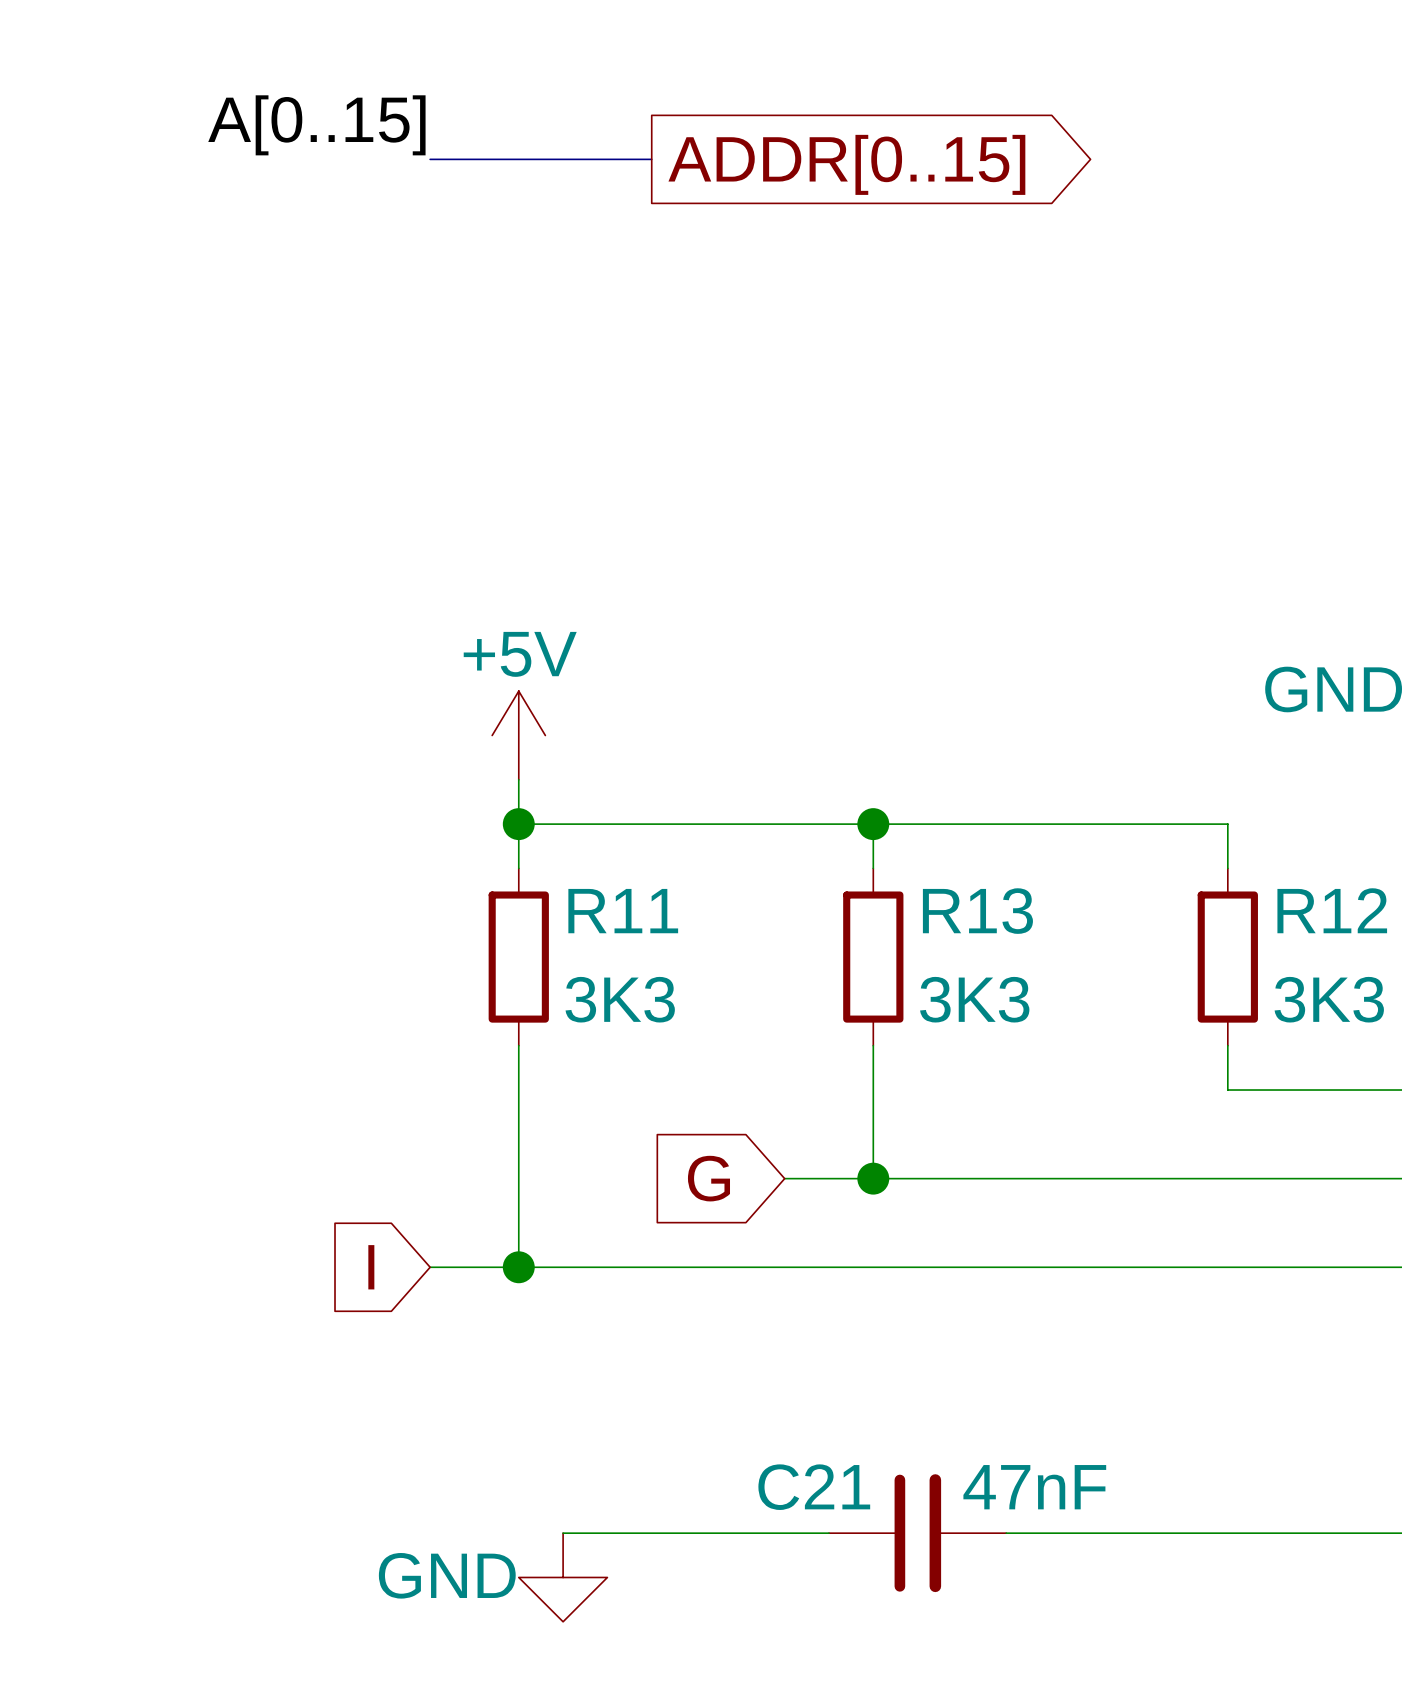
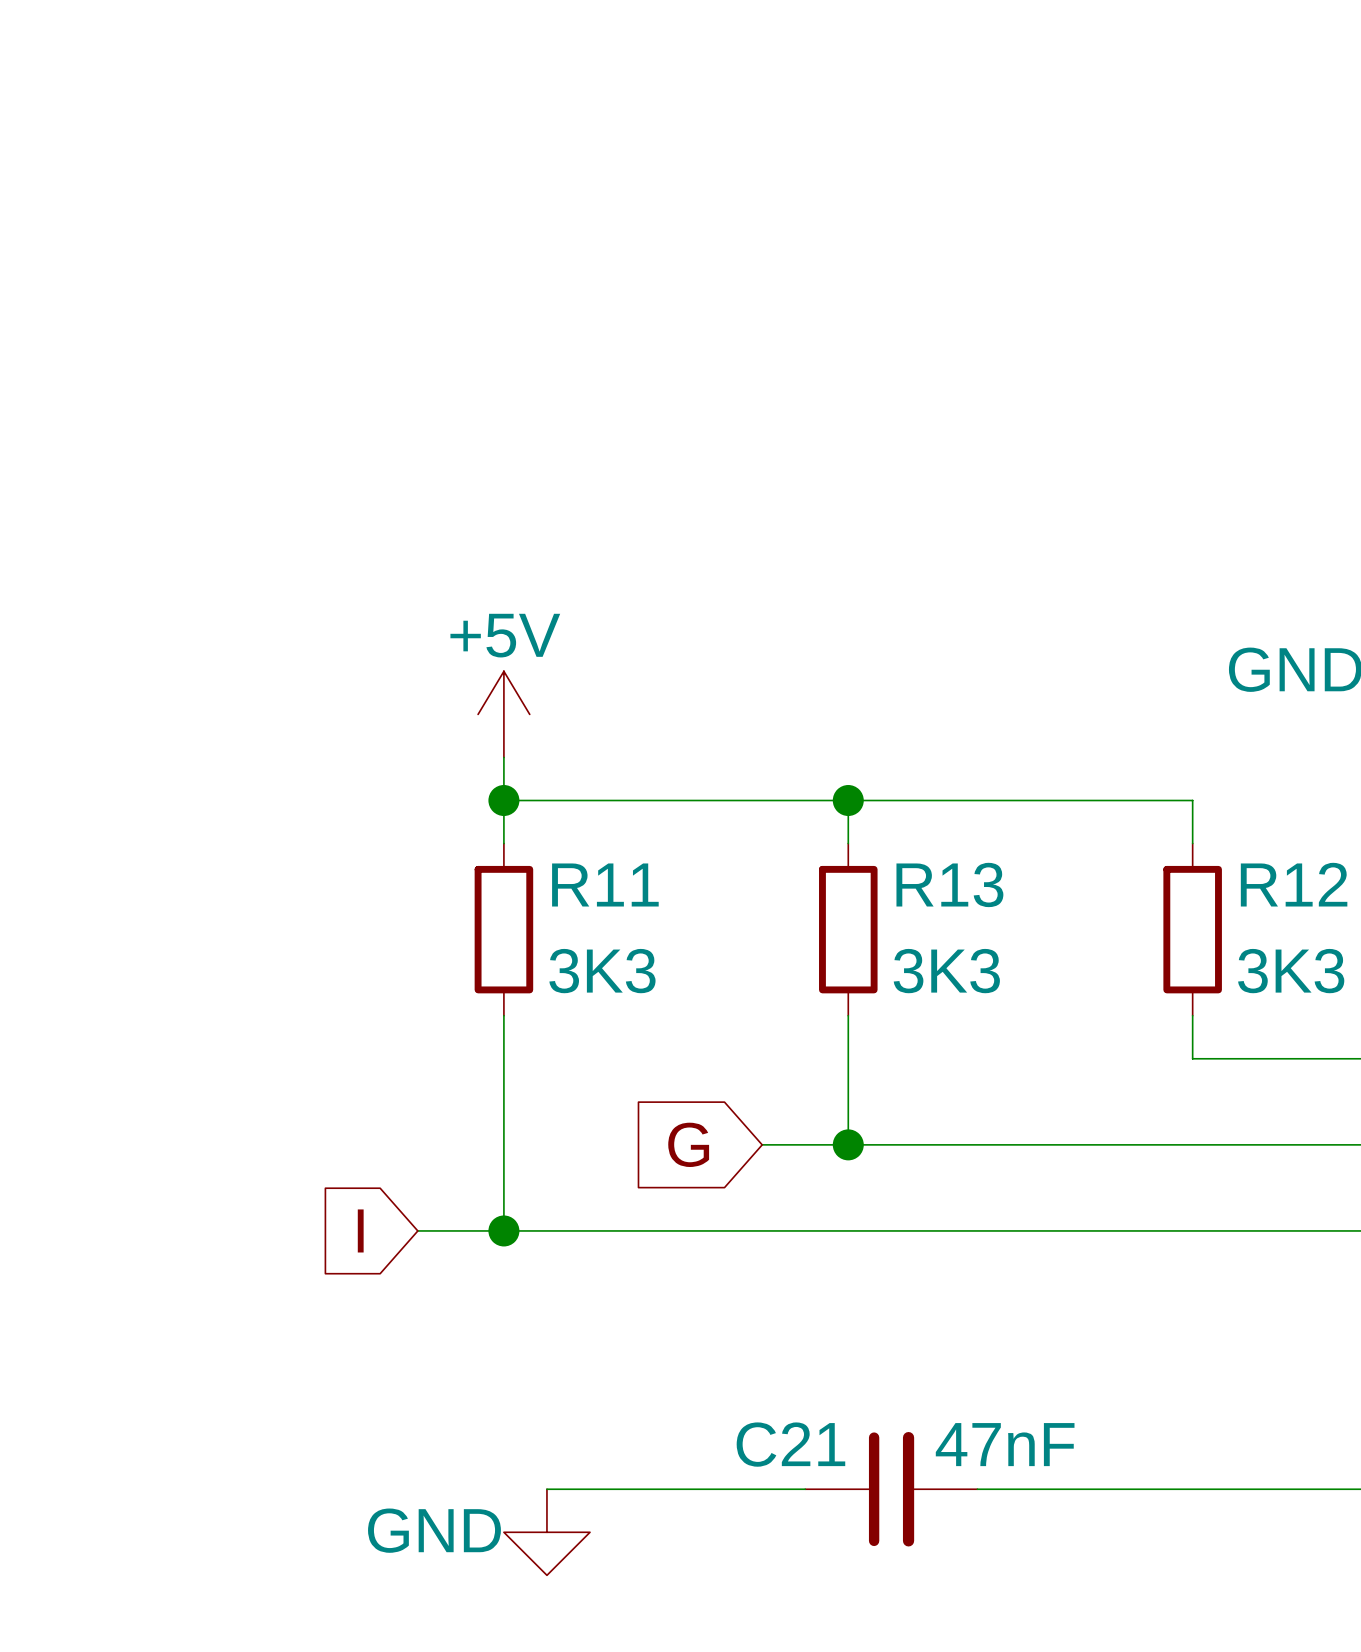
label: A[0..15] (316, 125) -> none
bus: (430, 159) (651, 159) -> none
global label: ADDR[0..15] (846, 164) -> none

